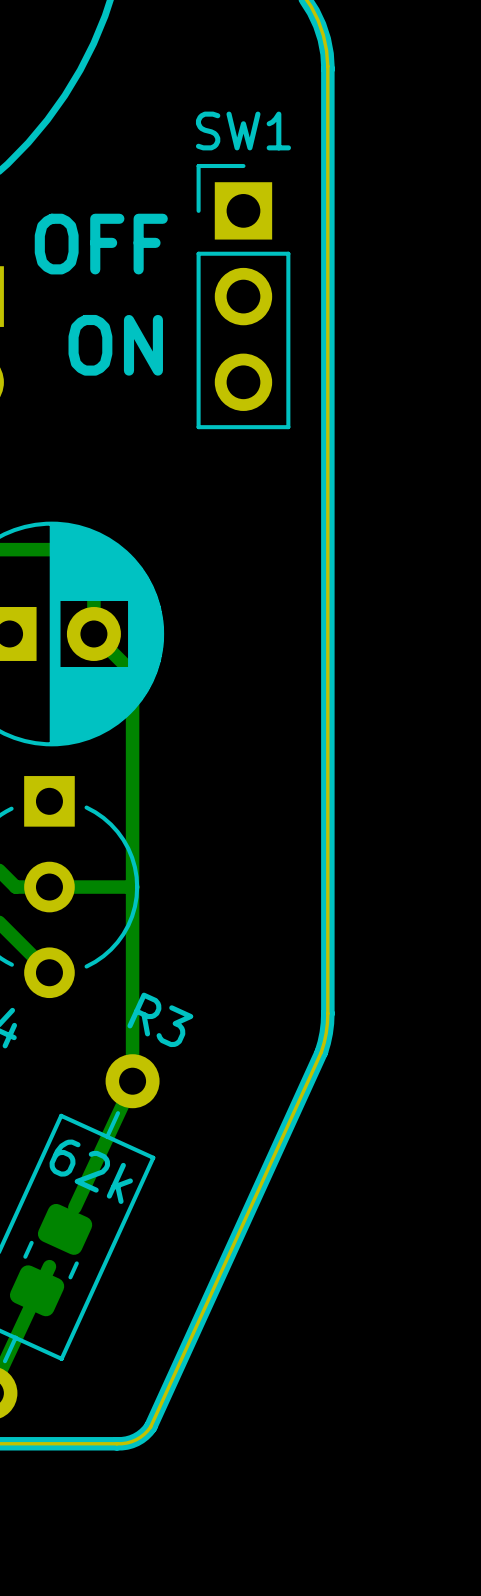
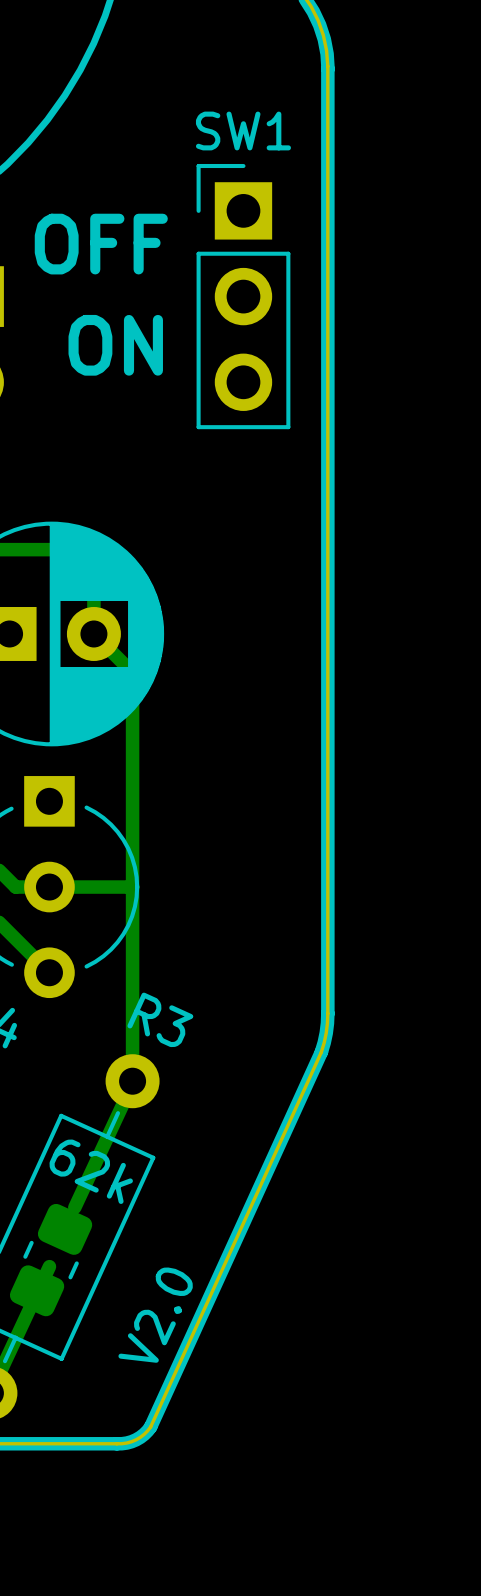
text: none -> V2.0 (155, 1315)

